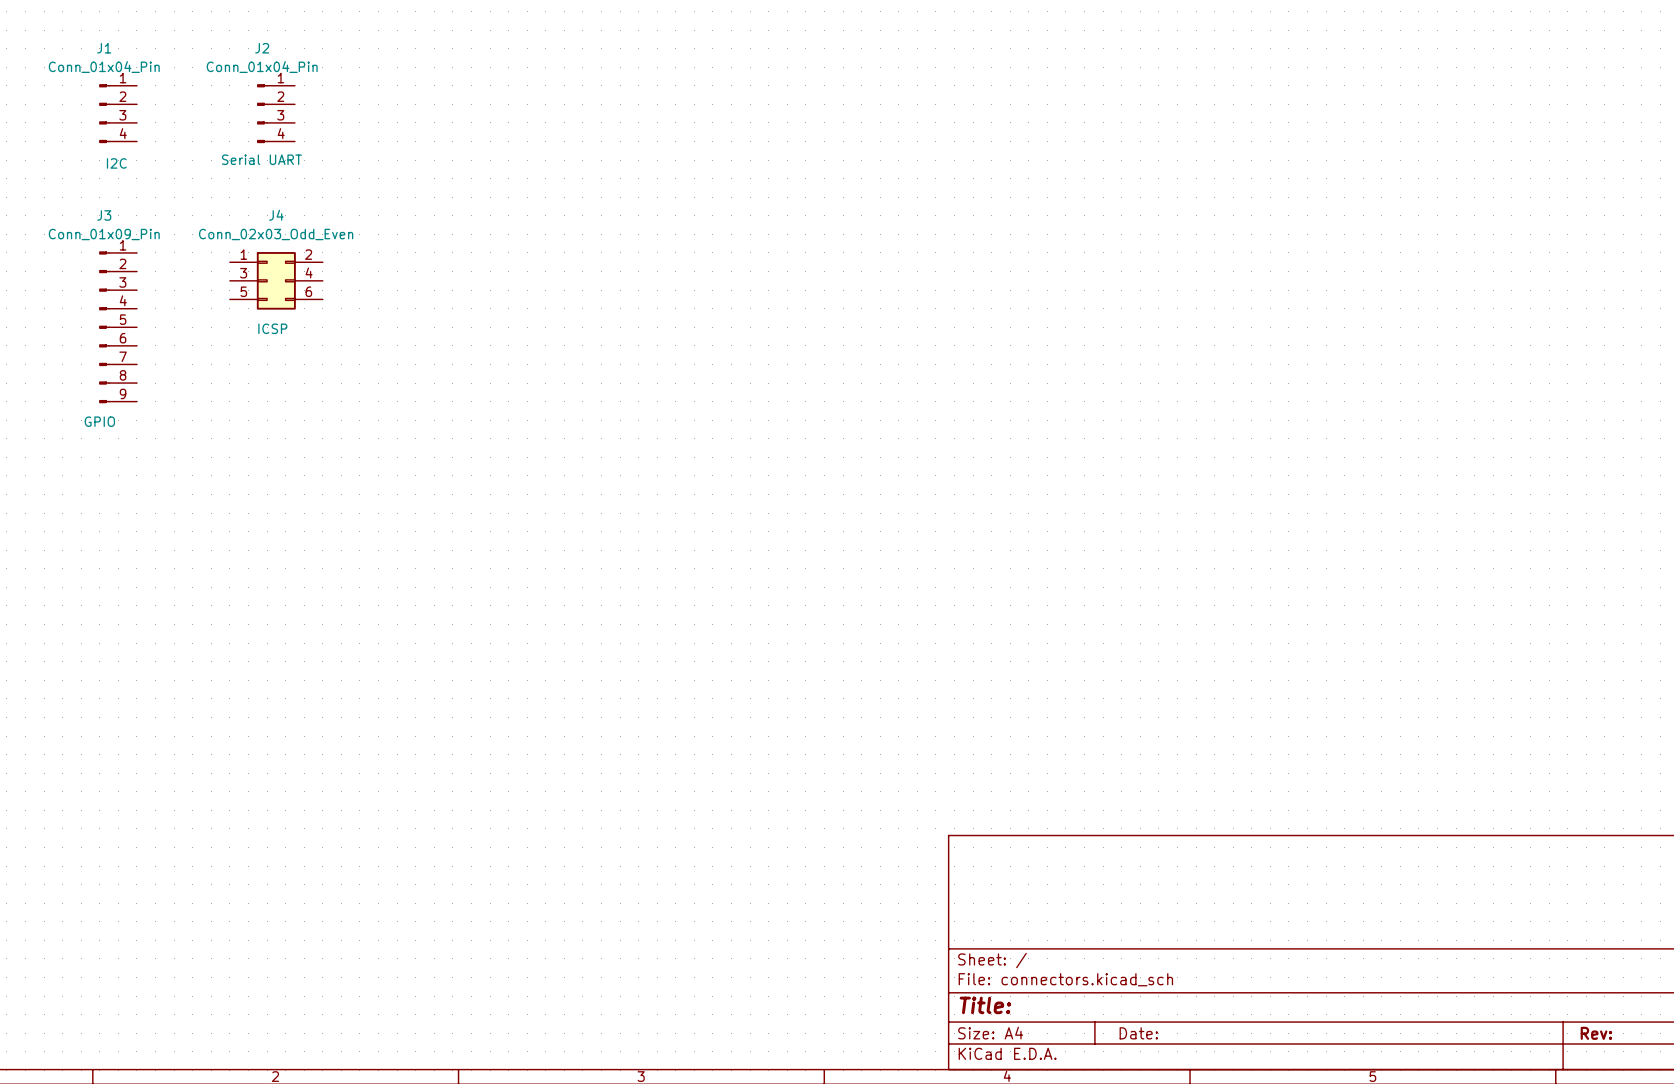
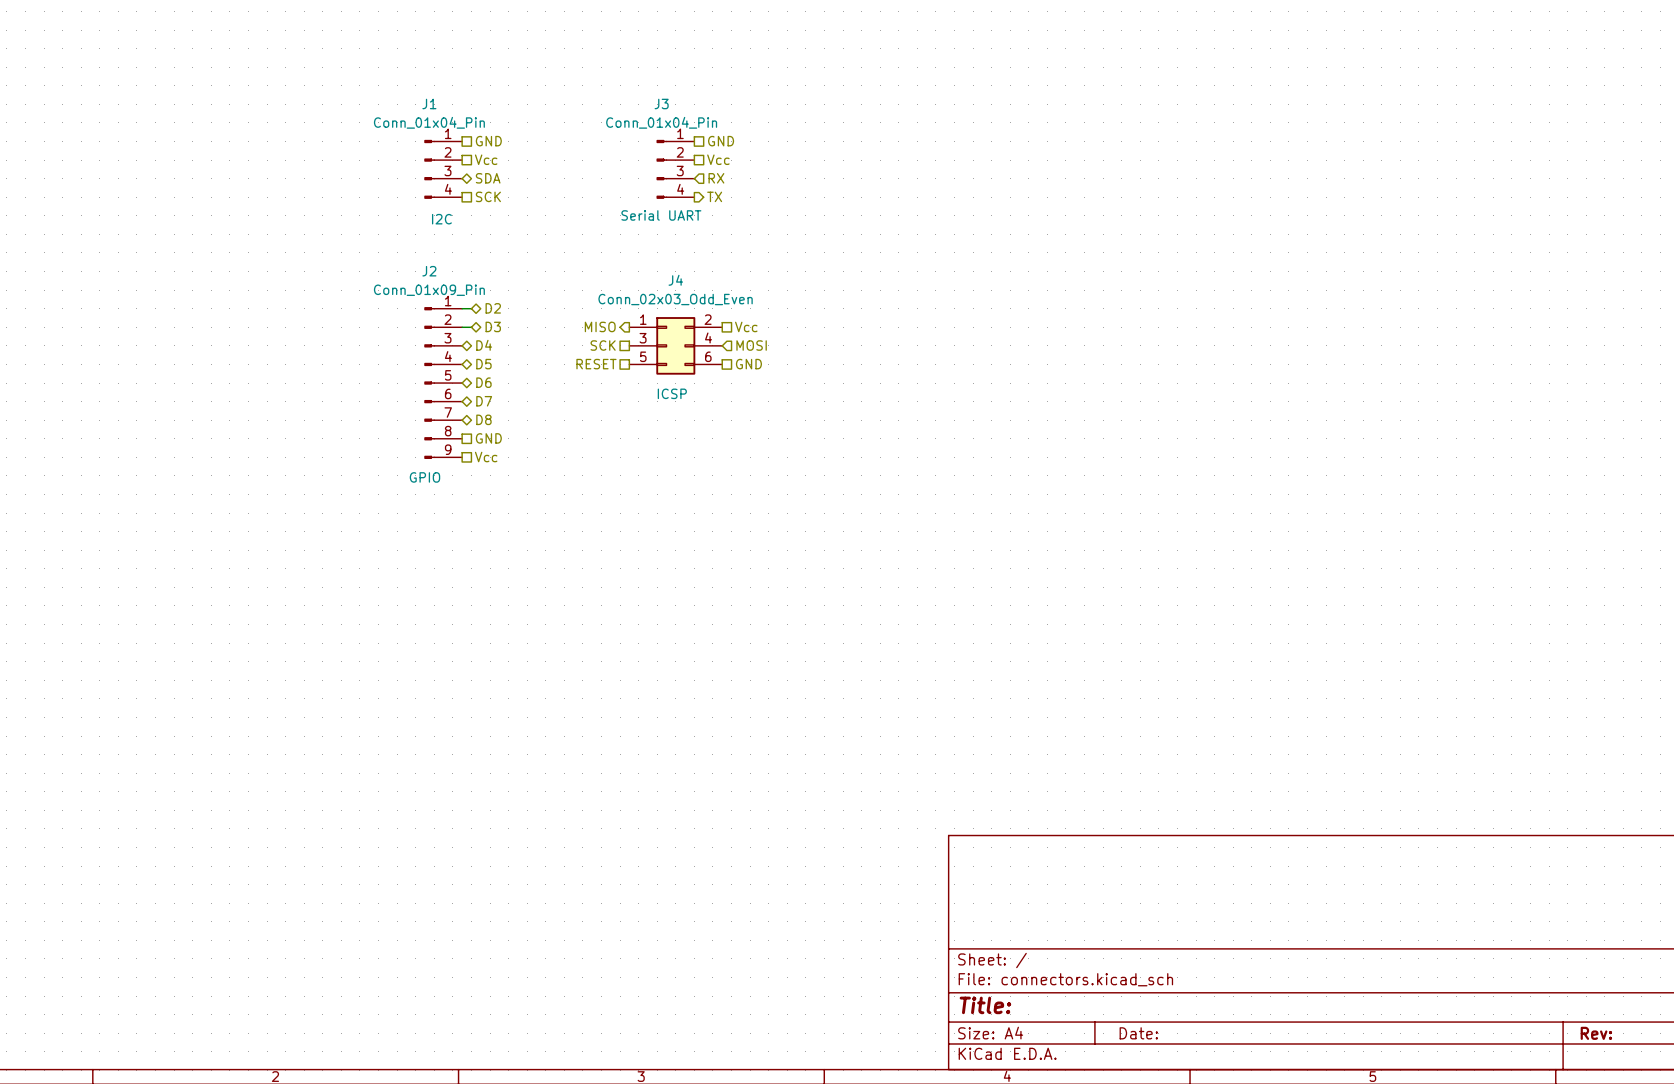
J2 name position: J2 (262, 48) -> J2 (429, 271)
J2 value: Conn_01x04_Pin (262, 67) -> Conn_01x09_Pin (429, 290)
J2 symbol: [257, 84, 295, 143] -> [424, 307, 463, 459]
J1 position: (118, 113) -> (443, 169)
hierarchical label: none -> GND (488, 141)
hierarchical label: none -> GND (721, 141)
J2 text: Serial UART (261, 159) -> GPIO (424, 477)
hierarchical label: none -> Vcc (486, 159)
hierarchical label: none -> Vcc (718, 159)
hierarchical label: none -> SDA (488, 178)
hierarchical label: none -> RX (716, 178)
hierarchical label: none -> SCK (488, 196)
hierarchical label: none -> TX (714, 196)
J3 name position: J3 (104, 215) -> J3 (661, 103)
J3 value: Conn_01x09_Pin (104, 234) -> Conn_01x04_Pin (661, 122)
J3 symbol: [99, 251, 137, 404] -> [656, 140, 695, 199]
J4 position: (276, 280) -> (675, 345)
wire: none -> (462, 308) (471, 308)
hierarchical label: none -> D2 (493, 308)
hierarchical label: none -> D3 (493, 326)
hierarchical label: none -> MISO (600, 326)
hierarchical label: none -> Vcc (746, 326)
wire: none -> (462, 327) (471, 327)
hierarchical label: none -> D4 (484, 345)
hierarchical label: none -> SCK (603, 345)
hierarchical label: none -> MOSI (751, 345)
hierarchical label: none -> D5 (483, 364)
hierarchical label: none -> RESET (596, 364)
hierarchical label: none -> GND (748, 364)
hierarchical label: none -> D6 (483, 382)
hierarchical label: none -> D7 (484, 401)
hierarchical label: none -> D8 (483, 419)
J3 text: GPIO (99, 421) -> Serial UART (661, 215)
hierarchical label: none -> GND (488, 438)
hierarchical label: none -> Vcc (486, 457)

